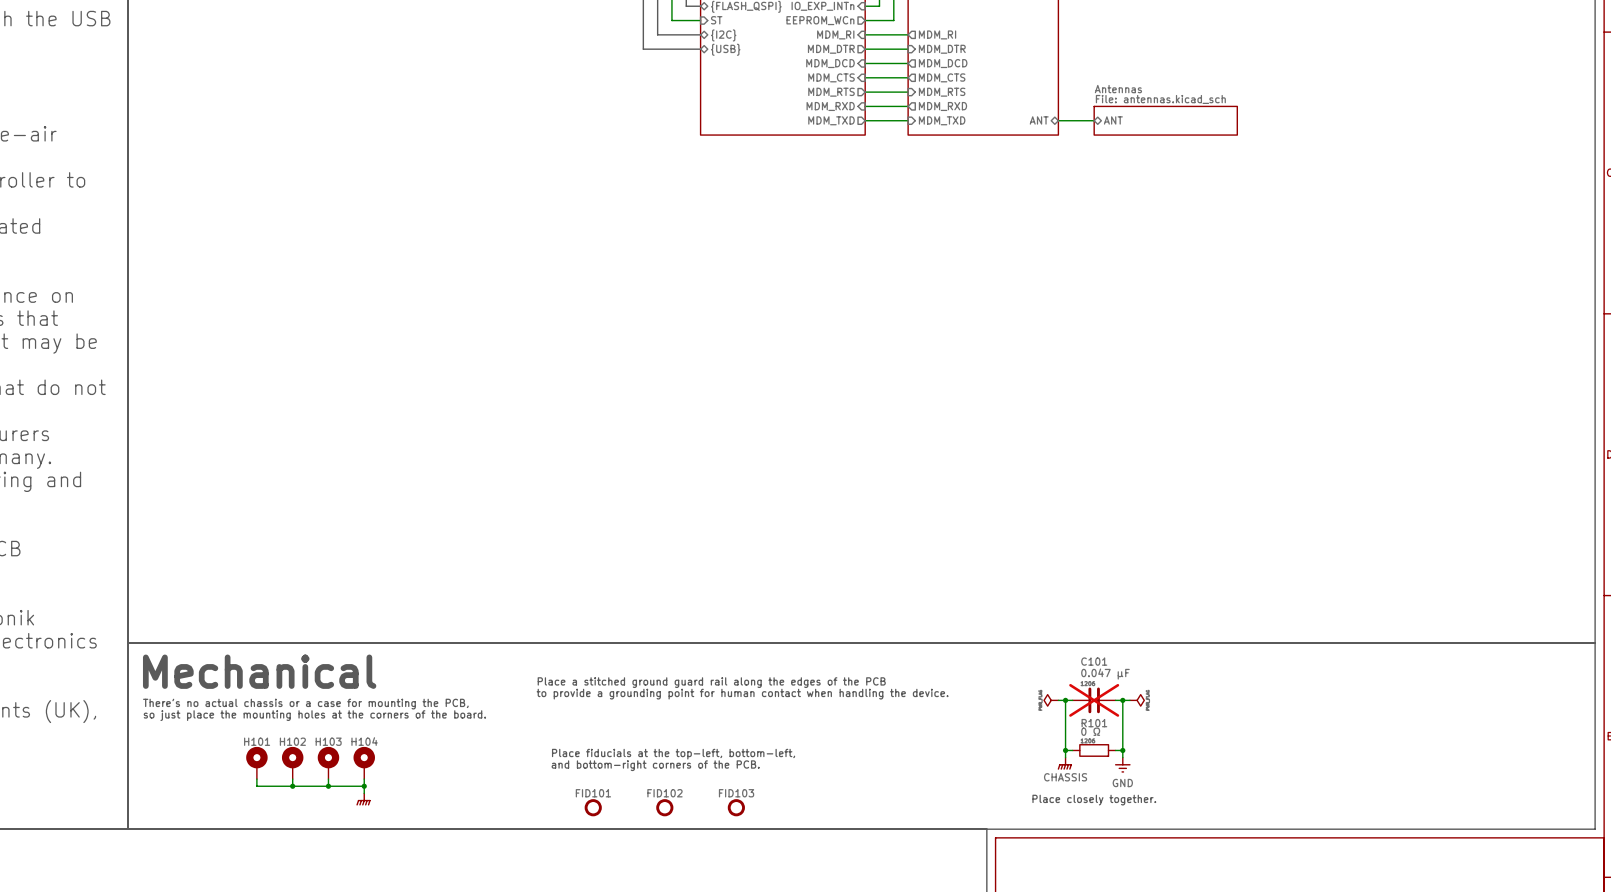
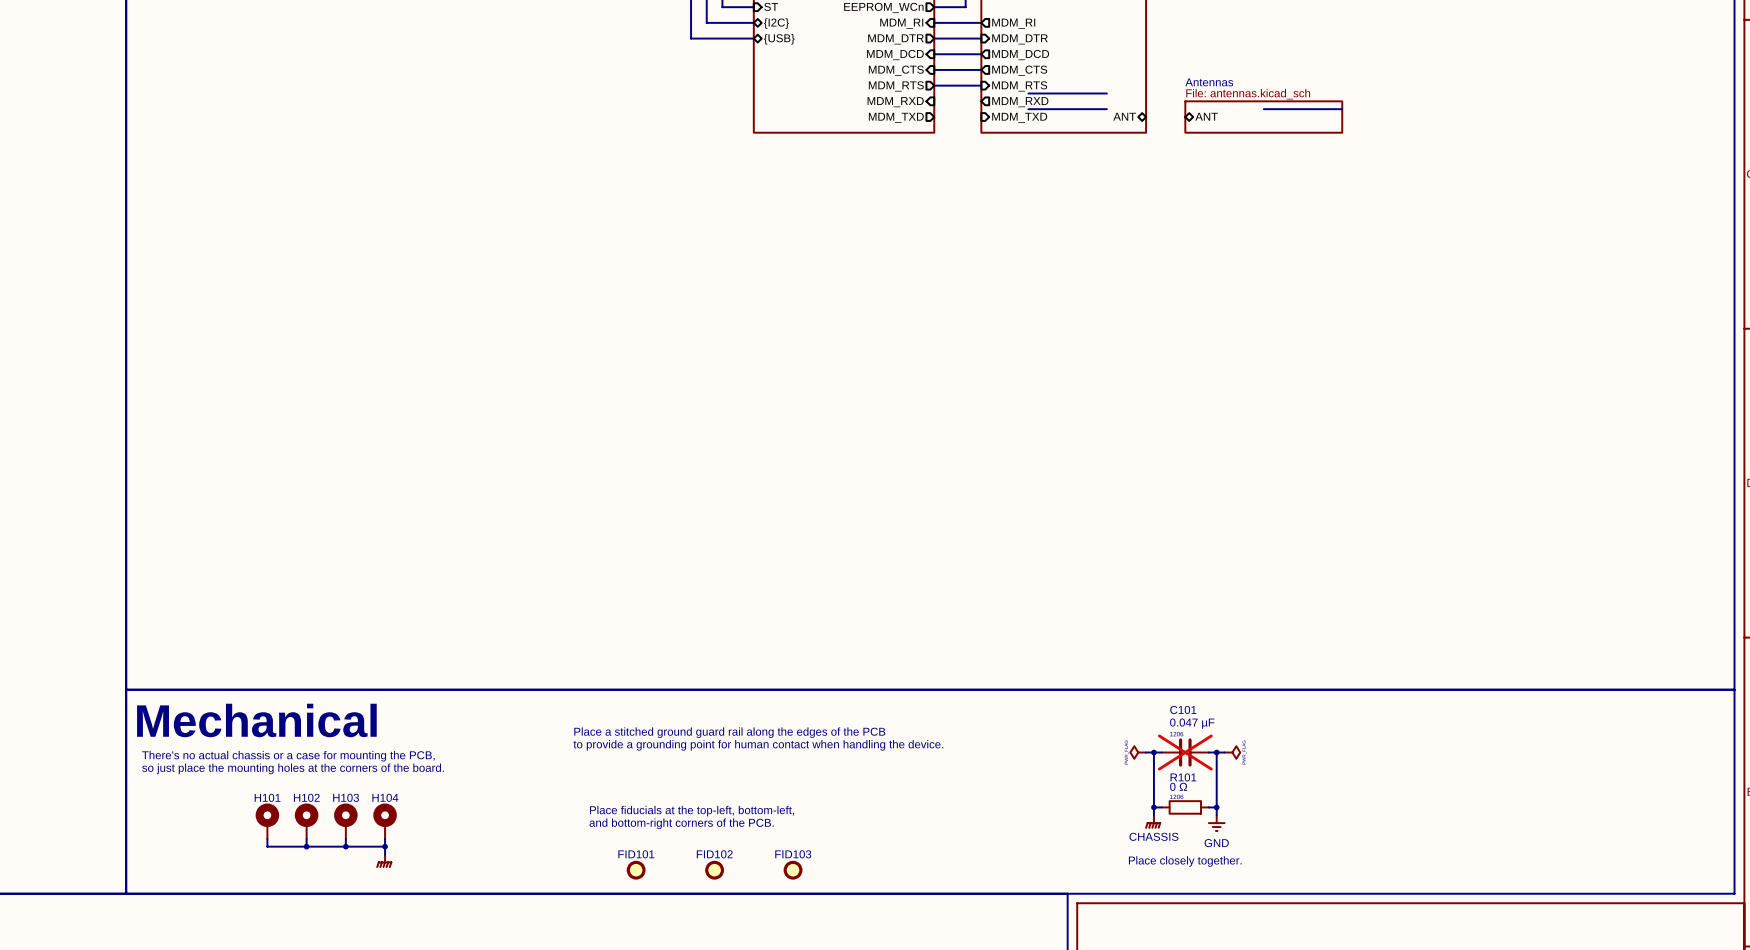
wire: none -> (1028, 93) (1106, 93)
wire: (865, 106) (908, 106) -> none
wire: none -> (1028, 109) (1106, 109)
wire: none -> (1263, 109) (1342, 109)
wire: (865, 120) (908, 120) -> none
wire: (1058, 120) (1094, 120) -> none

